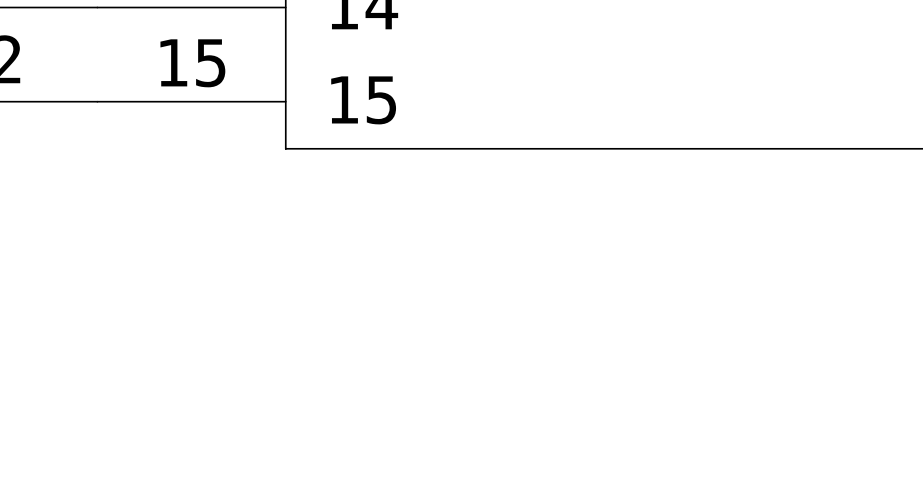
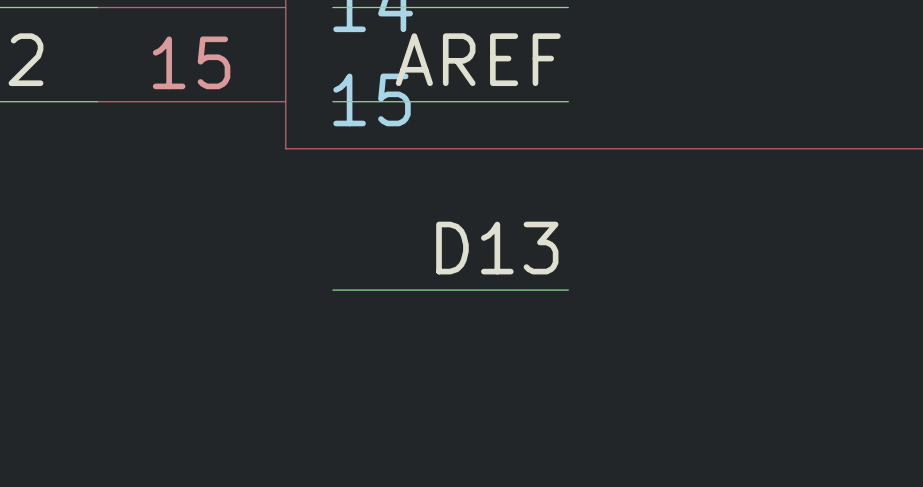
wire: none -> (332, 7) (568, 7)
label: none -> AREF (478, 59)
wire: none -> (332, 101) (568, 101)
label: none -> D13 (497, 248)
wire: none -> (332, 290) (568, 290)

